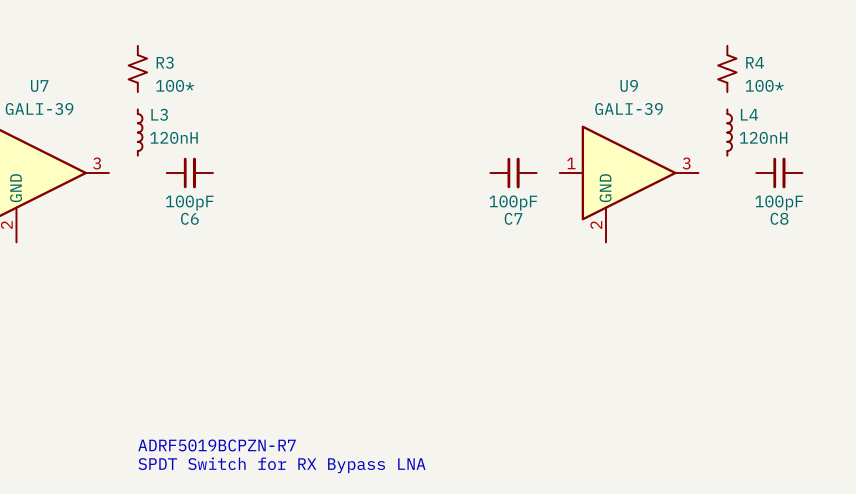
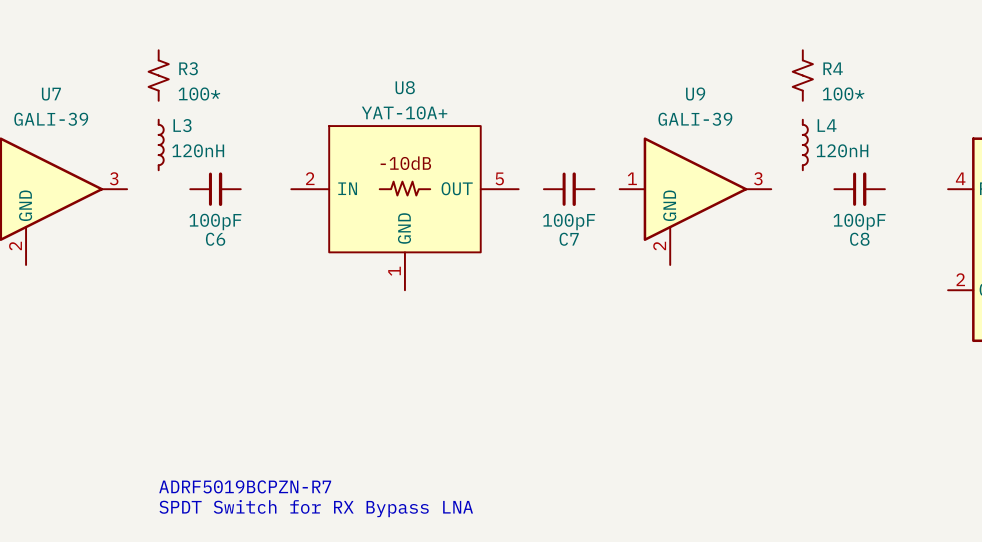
U8: none -> YAT-10A+ (404, 207)

